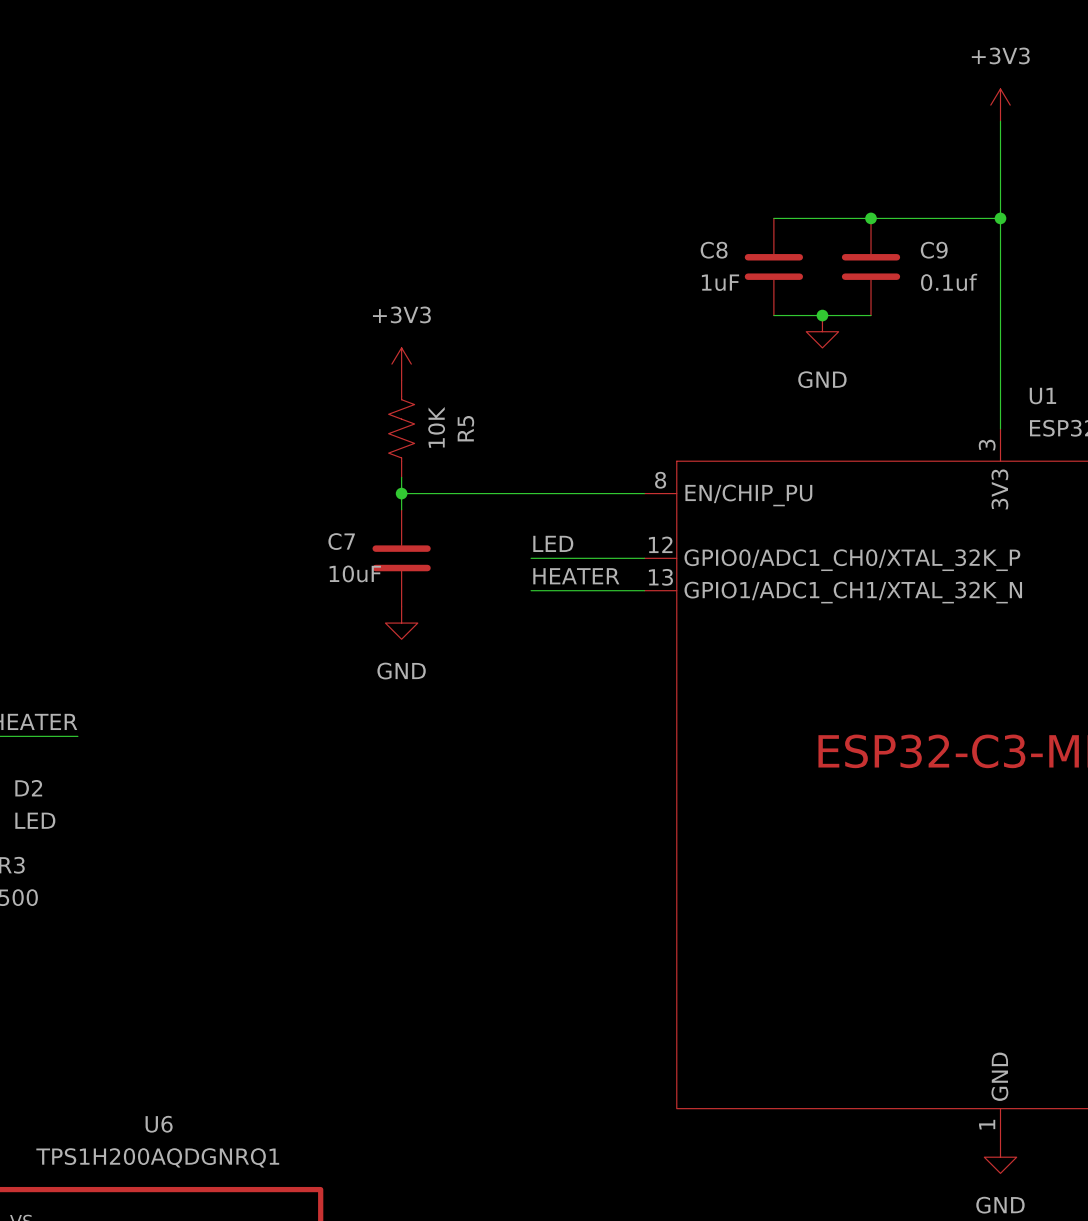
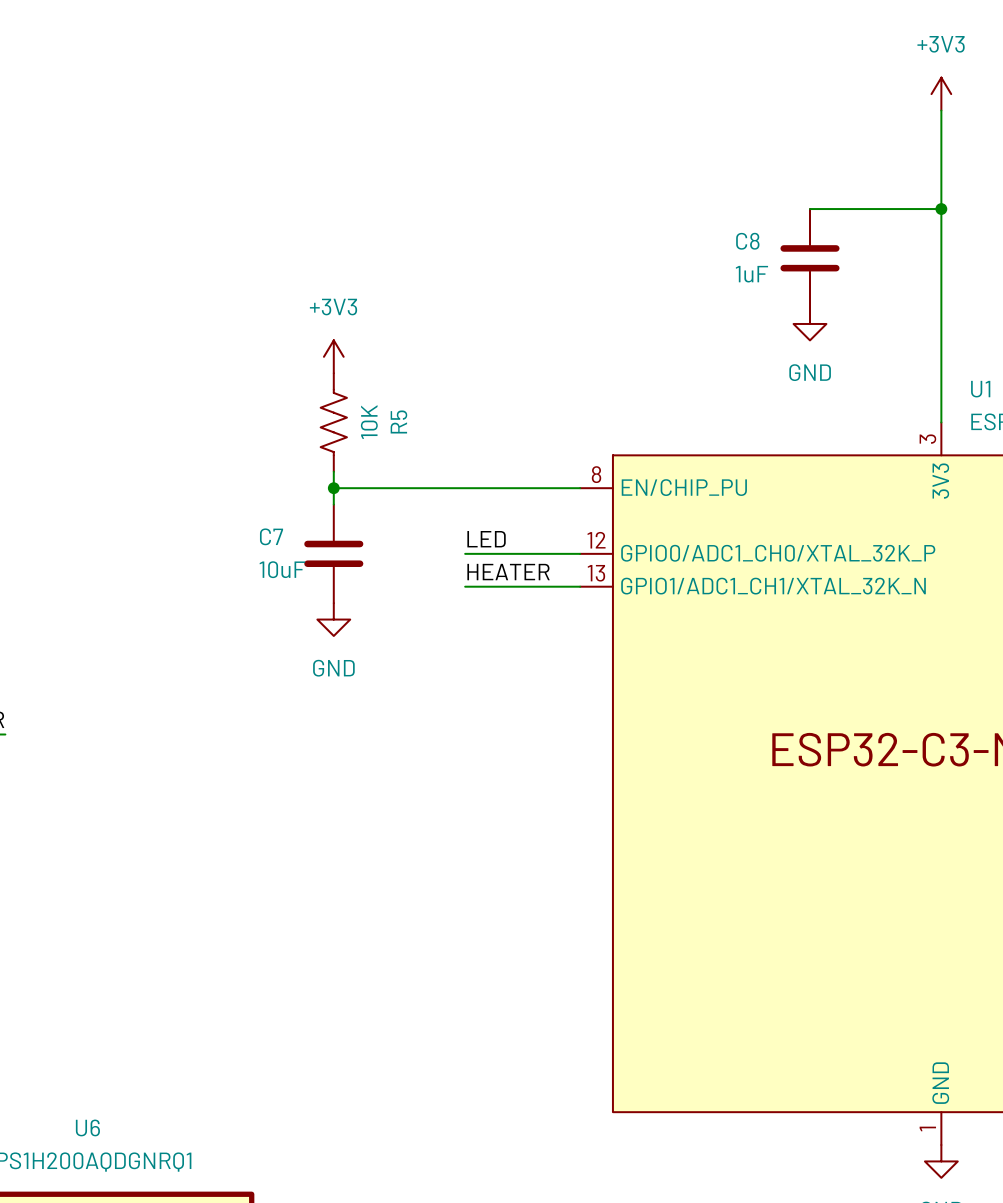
wire: (773, 218) (871, 218) -> none
junction: (871, 218) -> none
C9 name: C9 (934, 250) -> C8 (747, 241)
C8: 1uF (773, 266) -> none
C9 value: 0.1uf (949, 282) -> 1uF (751, 274)
wire: (773, 315) (871, 315) -> none
junction: (822, 315) -> none
power symbol position: GND (822, 331) -> GND (810, 323)

